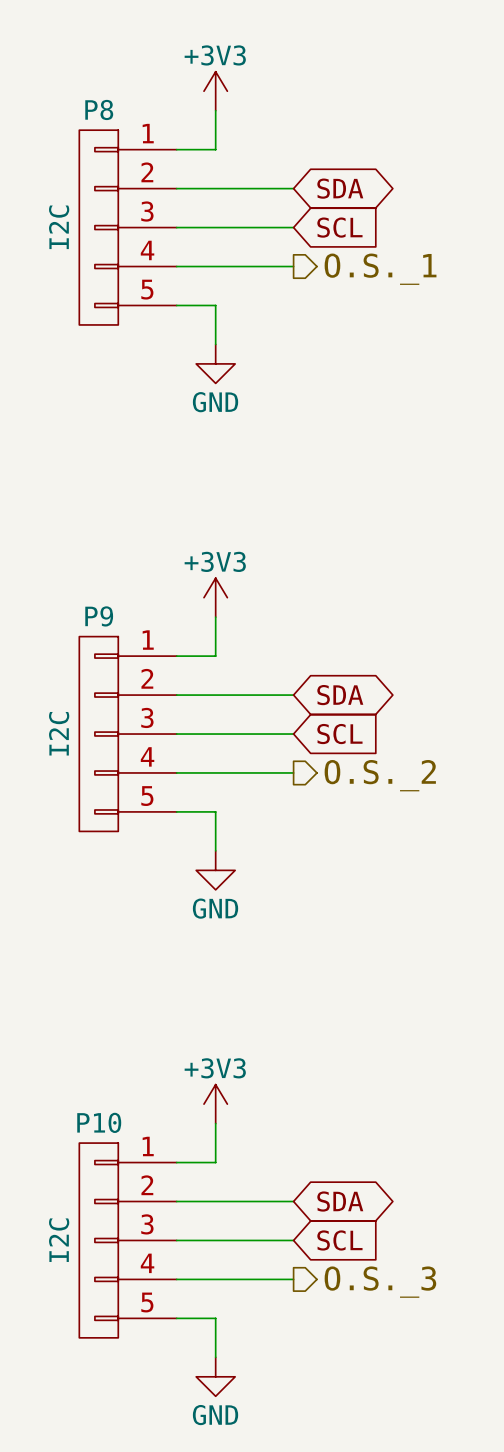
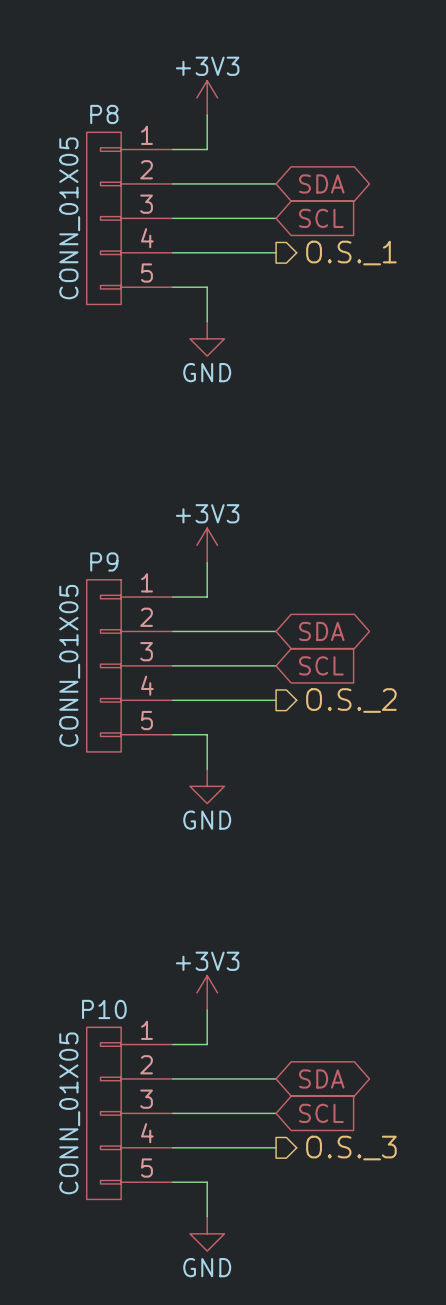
P8 value: I2C (59, 227) -> CONN_01X05 (69, 218)
P9 value: I2C (59, 733) -> CONN_01X05 (69, 665)
P10 value: I2C (59, 1240) -> CONN_01X05 (69, 1113)

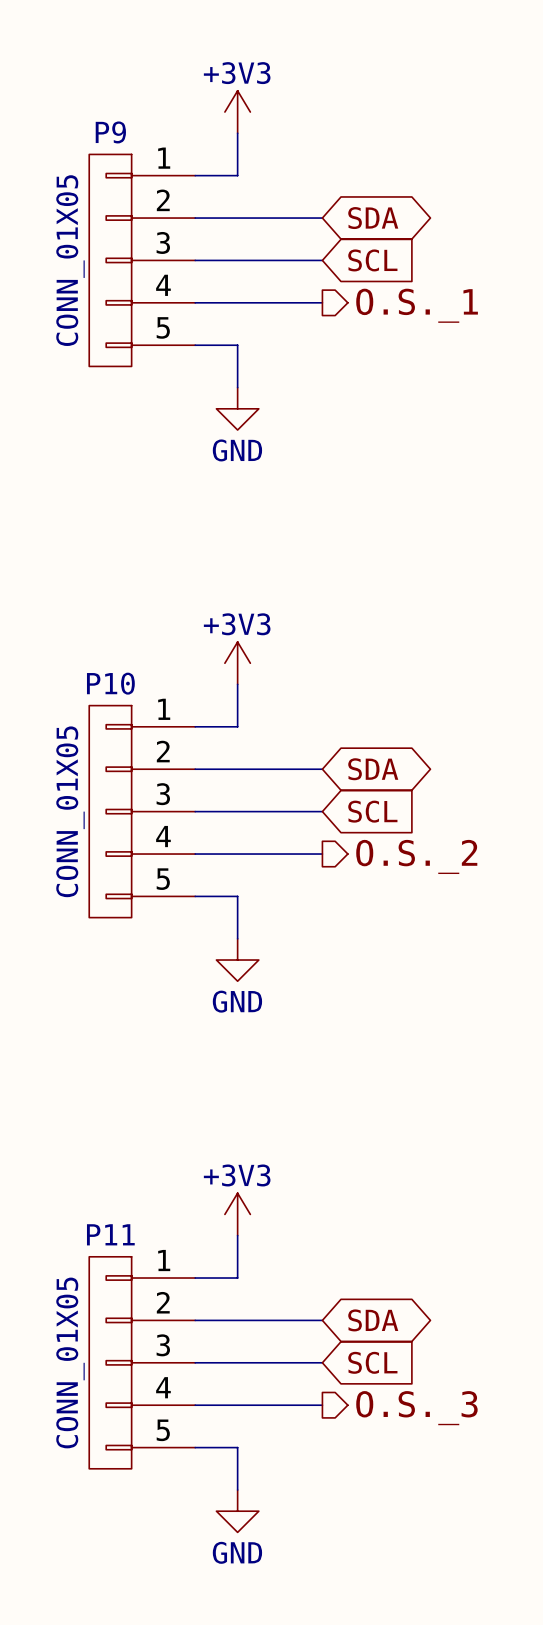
P8 name: P8 (104, 114) -> P9 (110, 132)
P9 name: P9 (104, 561) -> P10 (110, 683)
P10 name: P10 (104, 1009) -> P11 (110, 1234)

